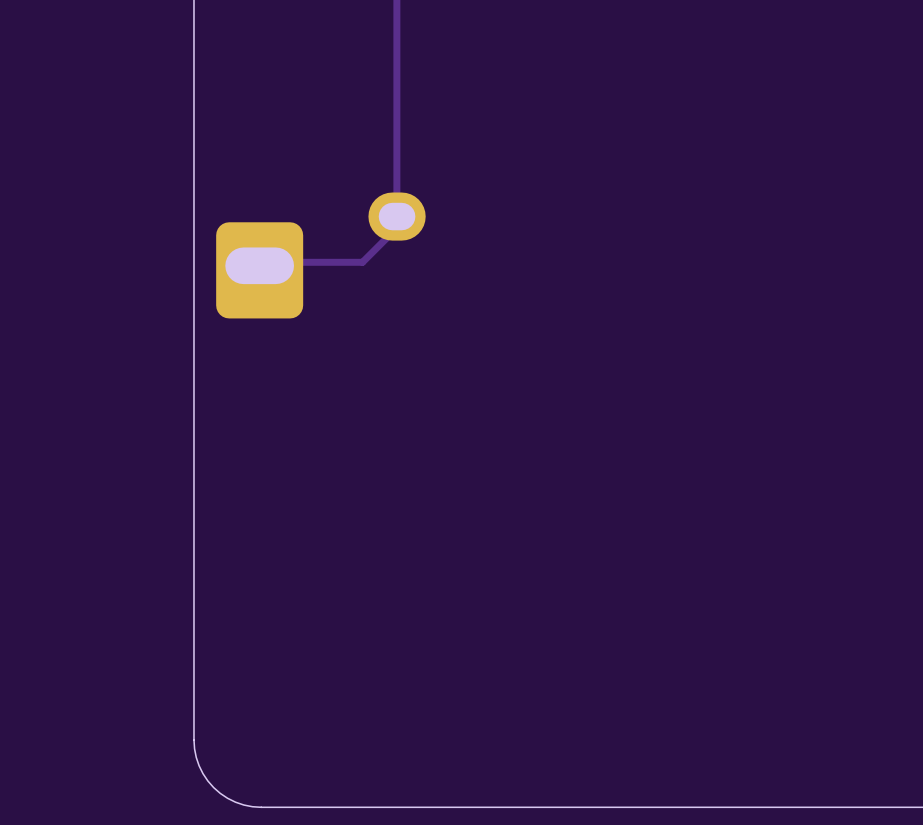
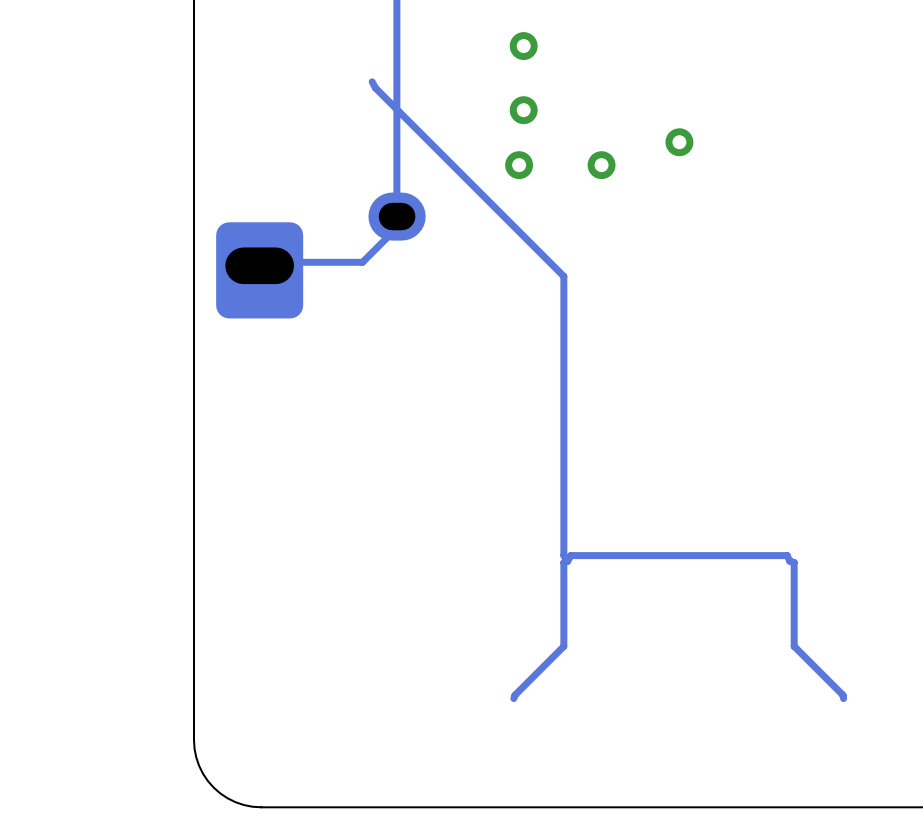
via: none -> (523, 46)
track: none -> (372, 81) (375, 87) (563, 276) (563, 555) (567, 561)
via: none -> (523, 110)
via: none -> (679, 142)
via: none -> (519, 165)
via: none -> (601, 165)
track: none -> (567, 561) (563, 562) (563, 646) (514, 695) (513, 698)
track: none -> (567, 561) (570, 555) (787, 555) (789, 561) (794, 562) (794, 646) (843, 695) (843, 698)

